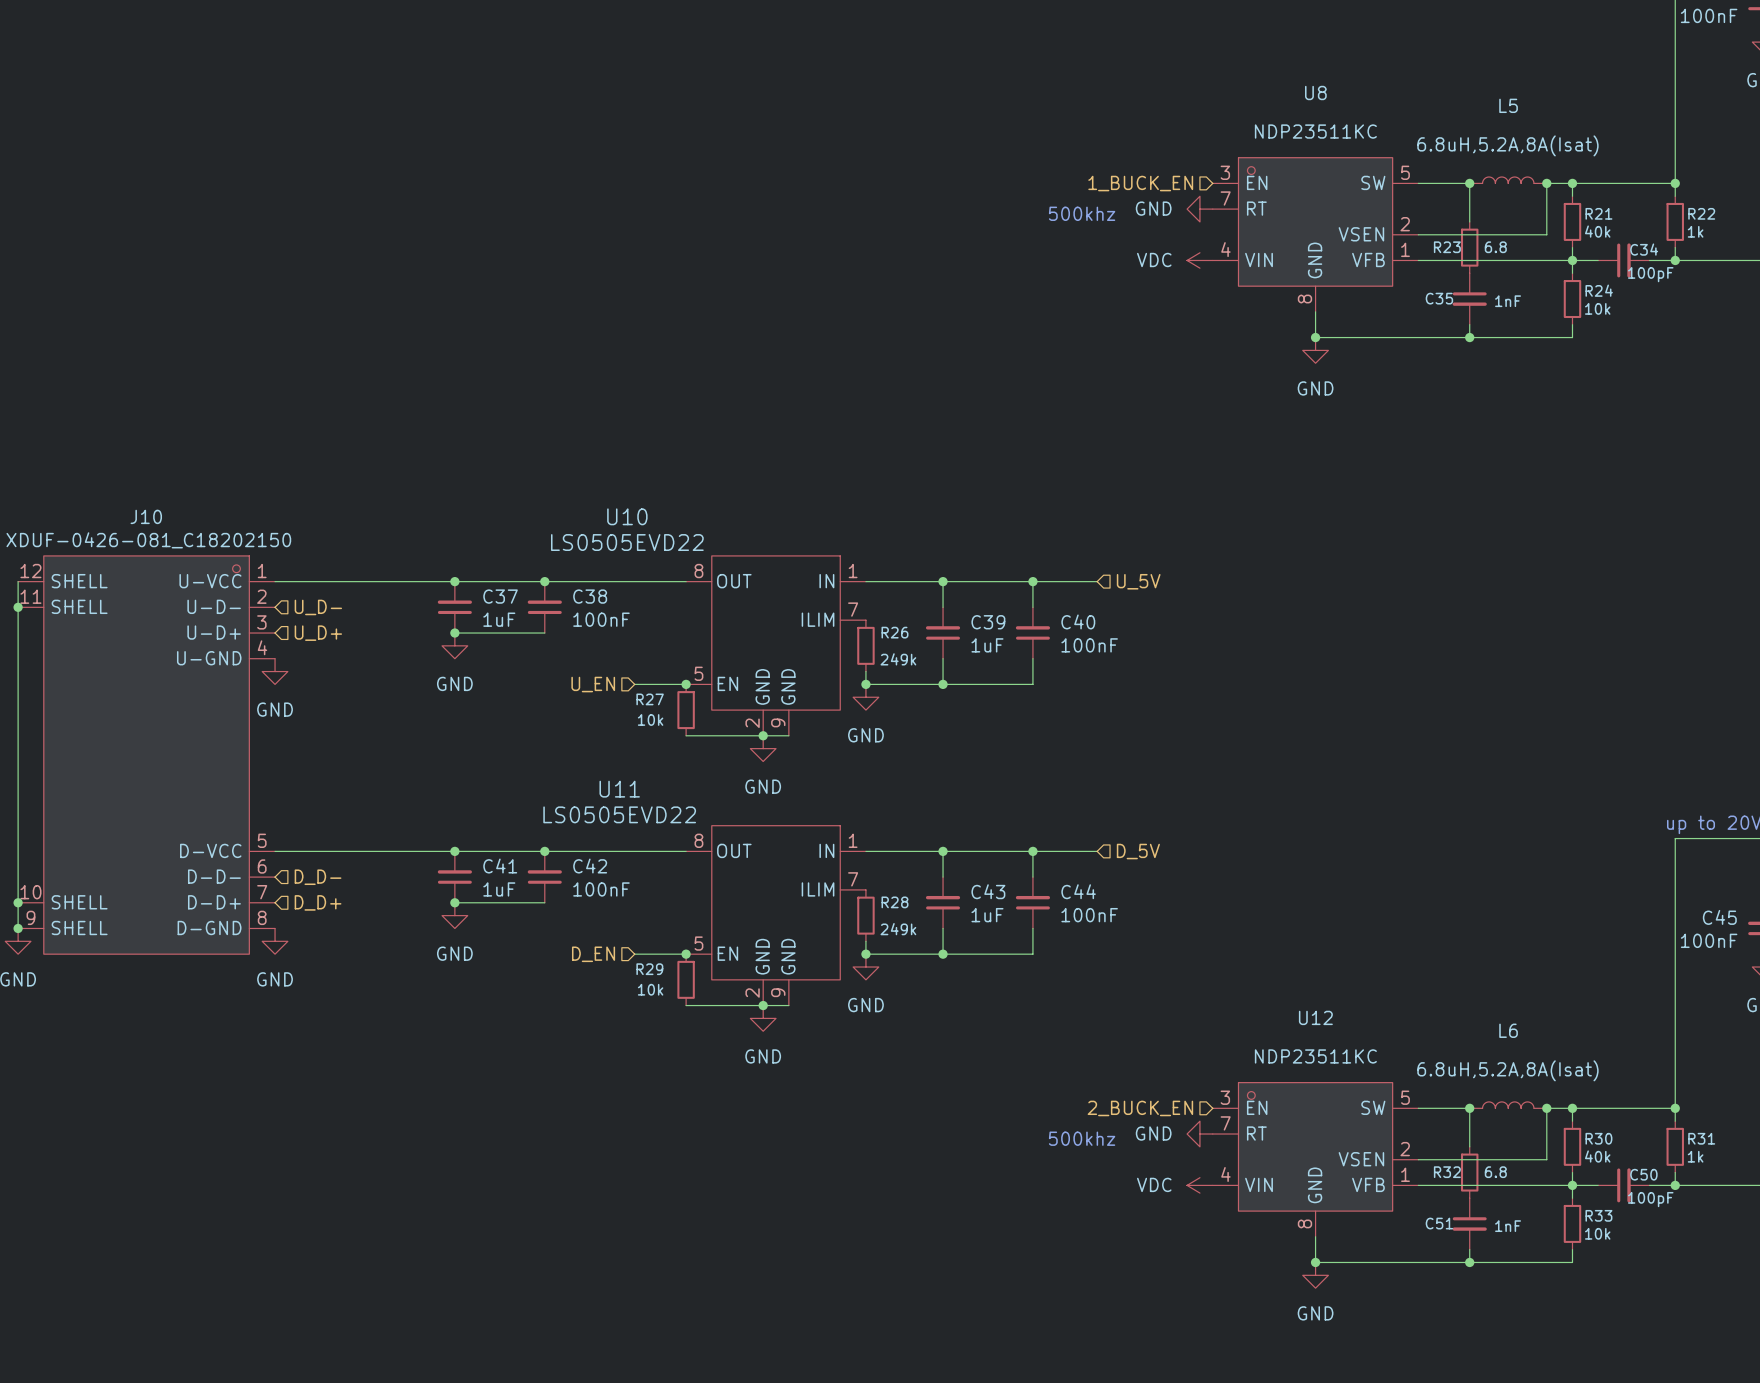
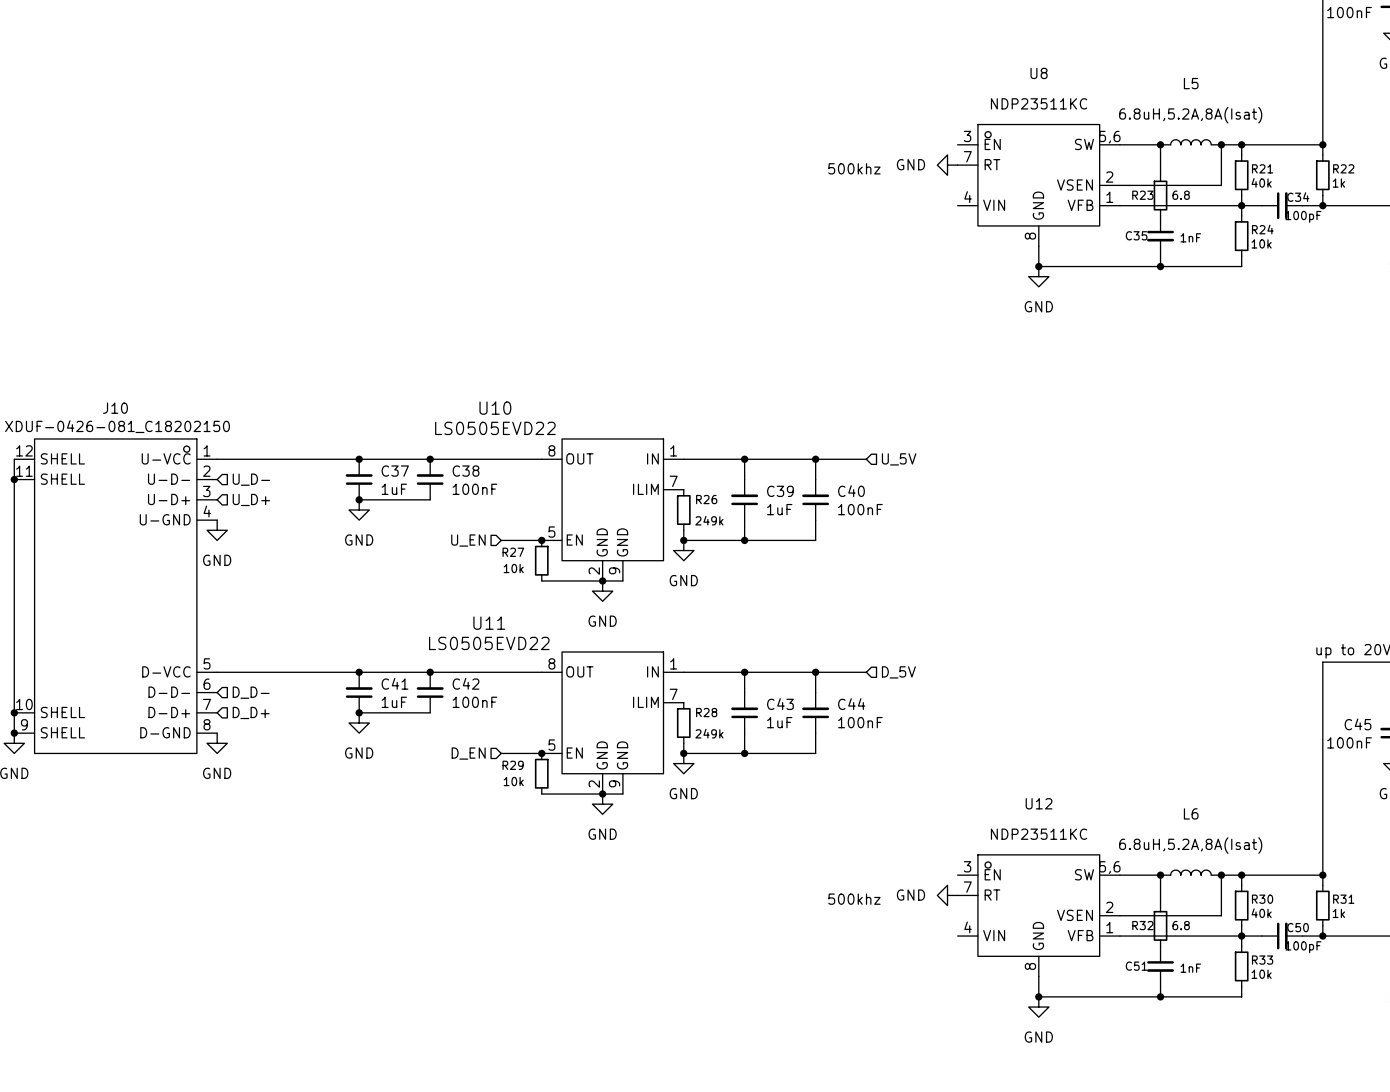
U8 pin number: 5 (1405, 172) -> 5,6 (1109, 137)
hierarchical label: 1_BUCK_EN (1140, 183) -> none
power symbol: VDC (1199, 260) -> none
U12 pin number: 5 (1405, 1097) -> 5,6 (1109, 867)
hierarchical label: 2_BUCK_EN (1140, 1108) -> none
power symbol: VDC (1199, 1185) -> none

